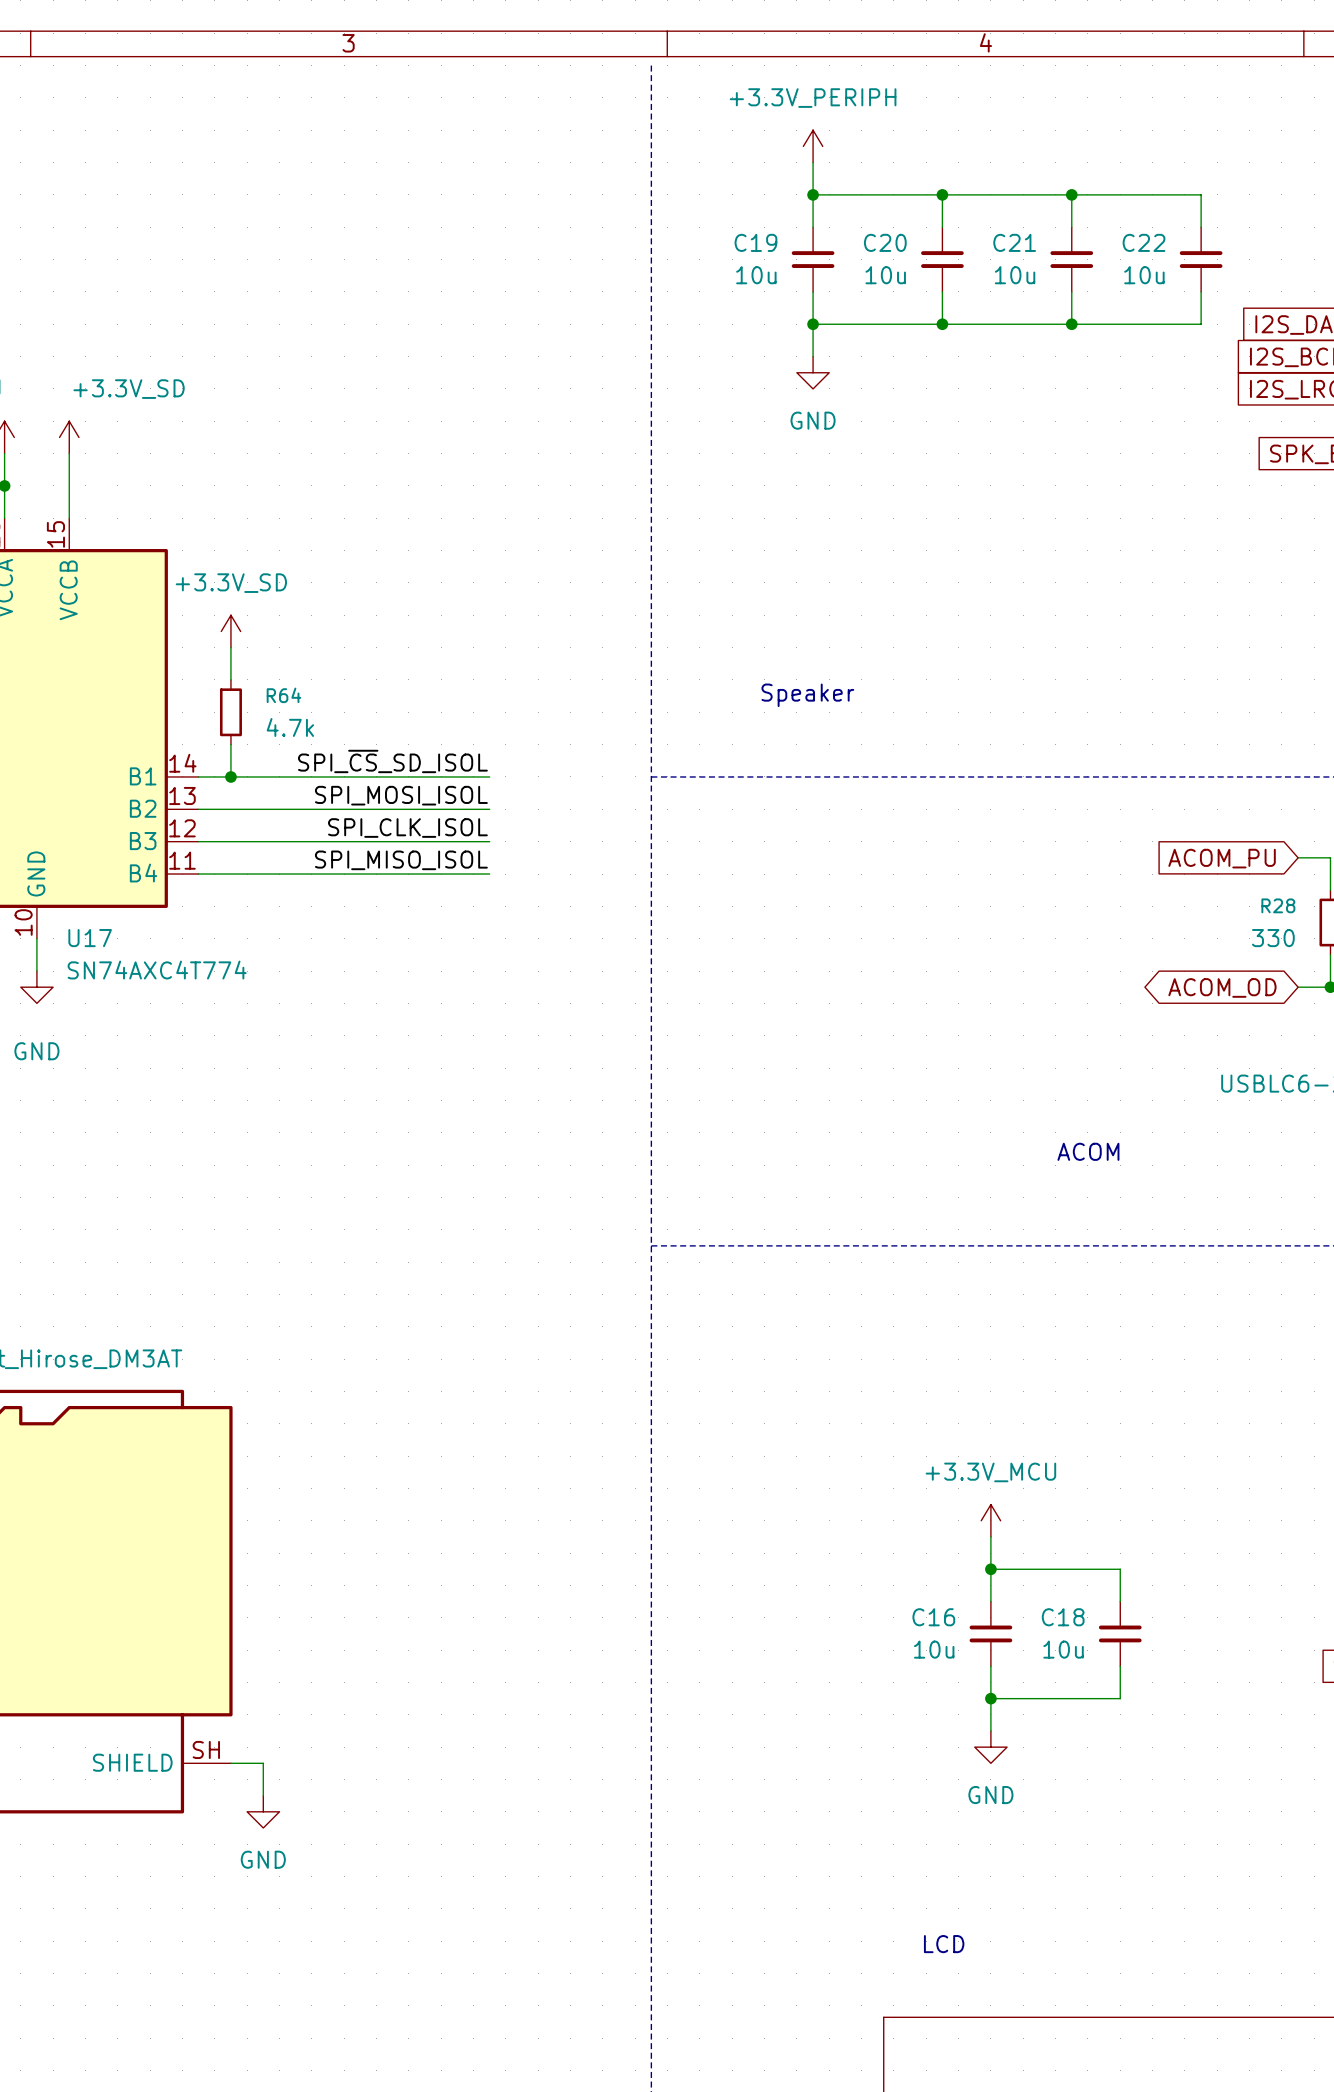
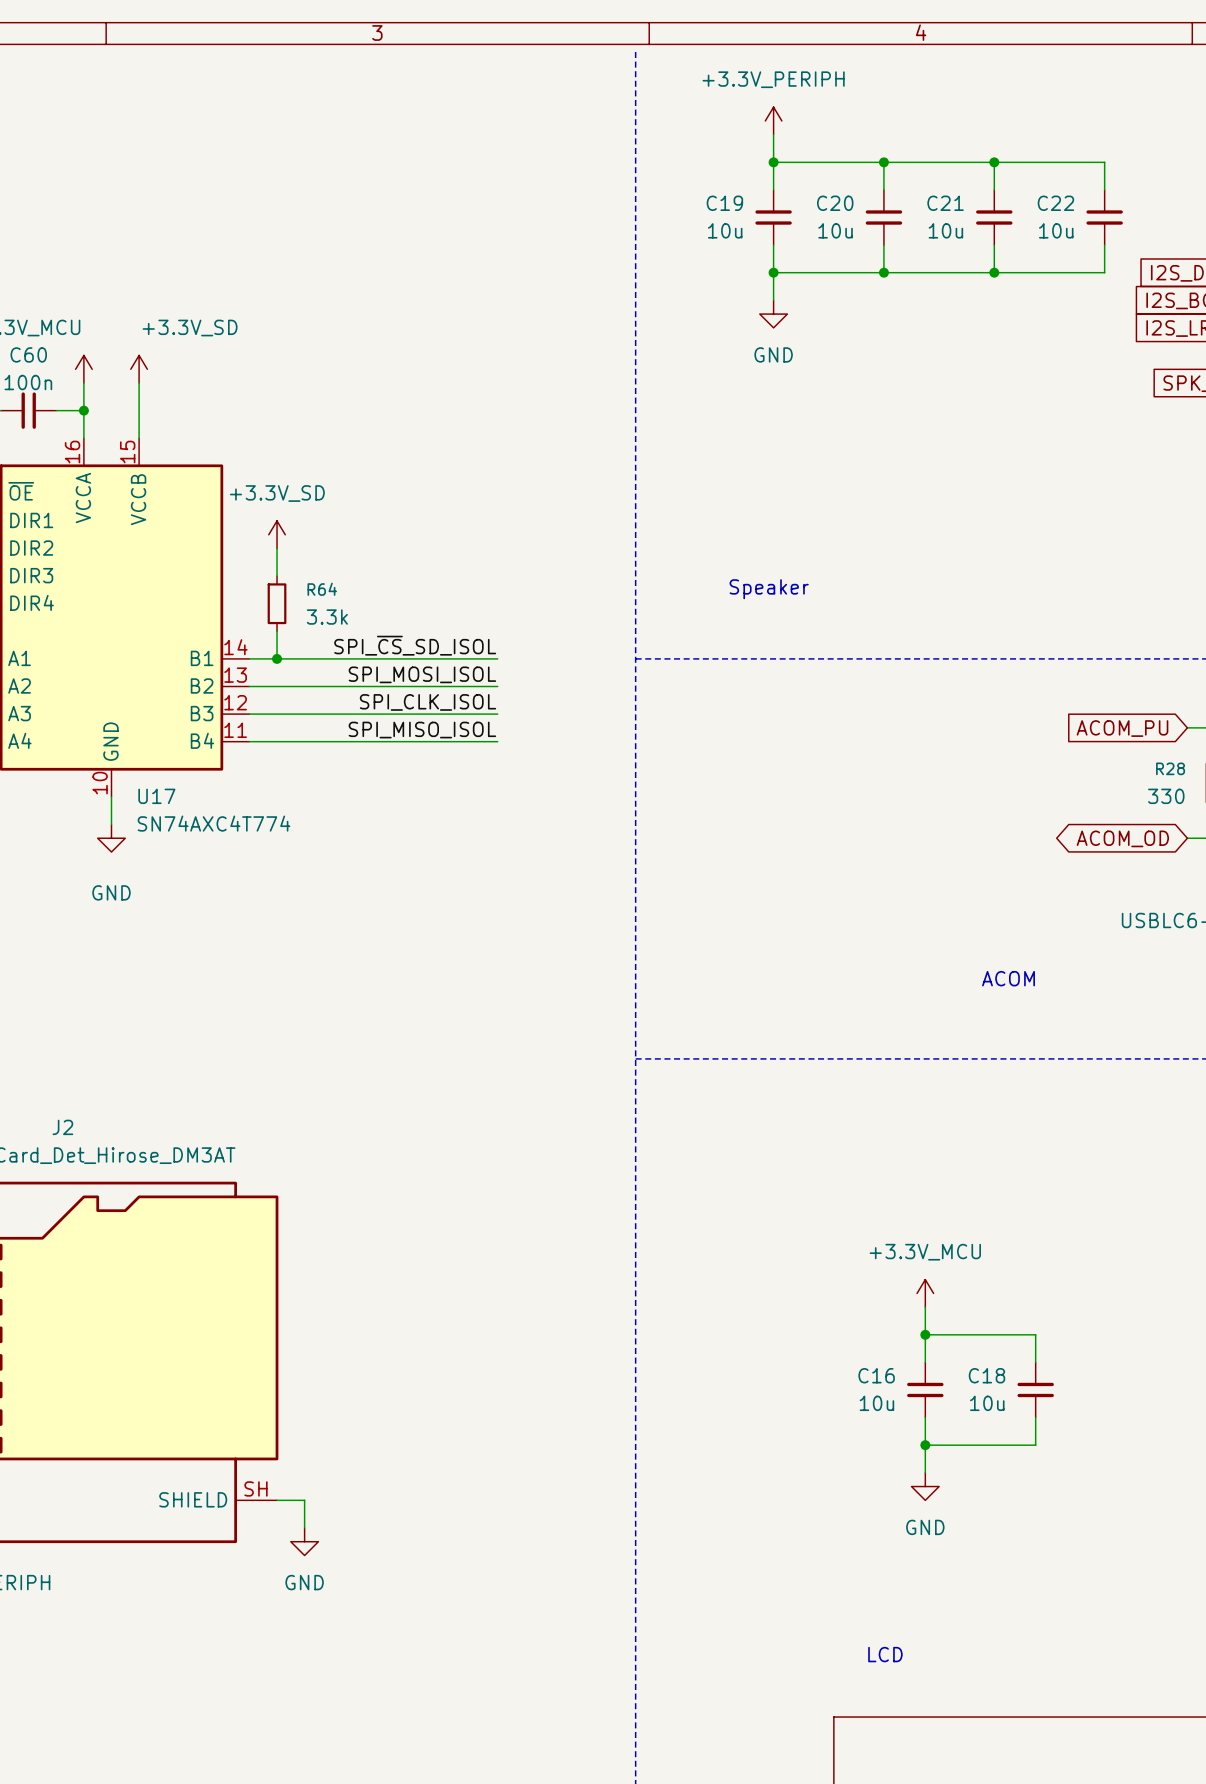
R64 value: 4.7k (290, 727) -> 3.3k (327, 617)

